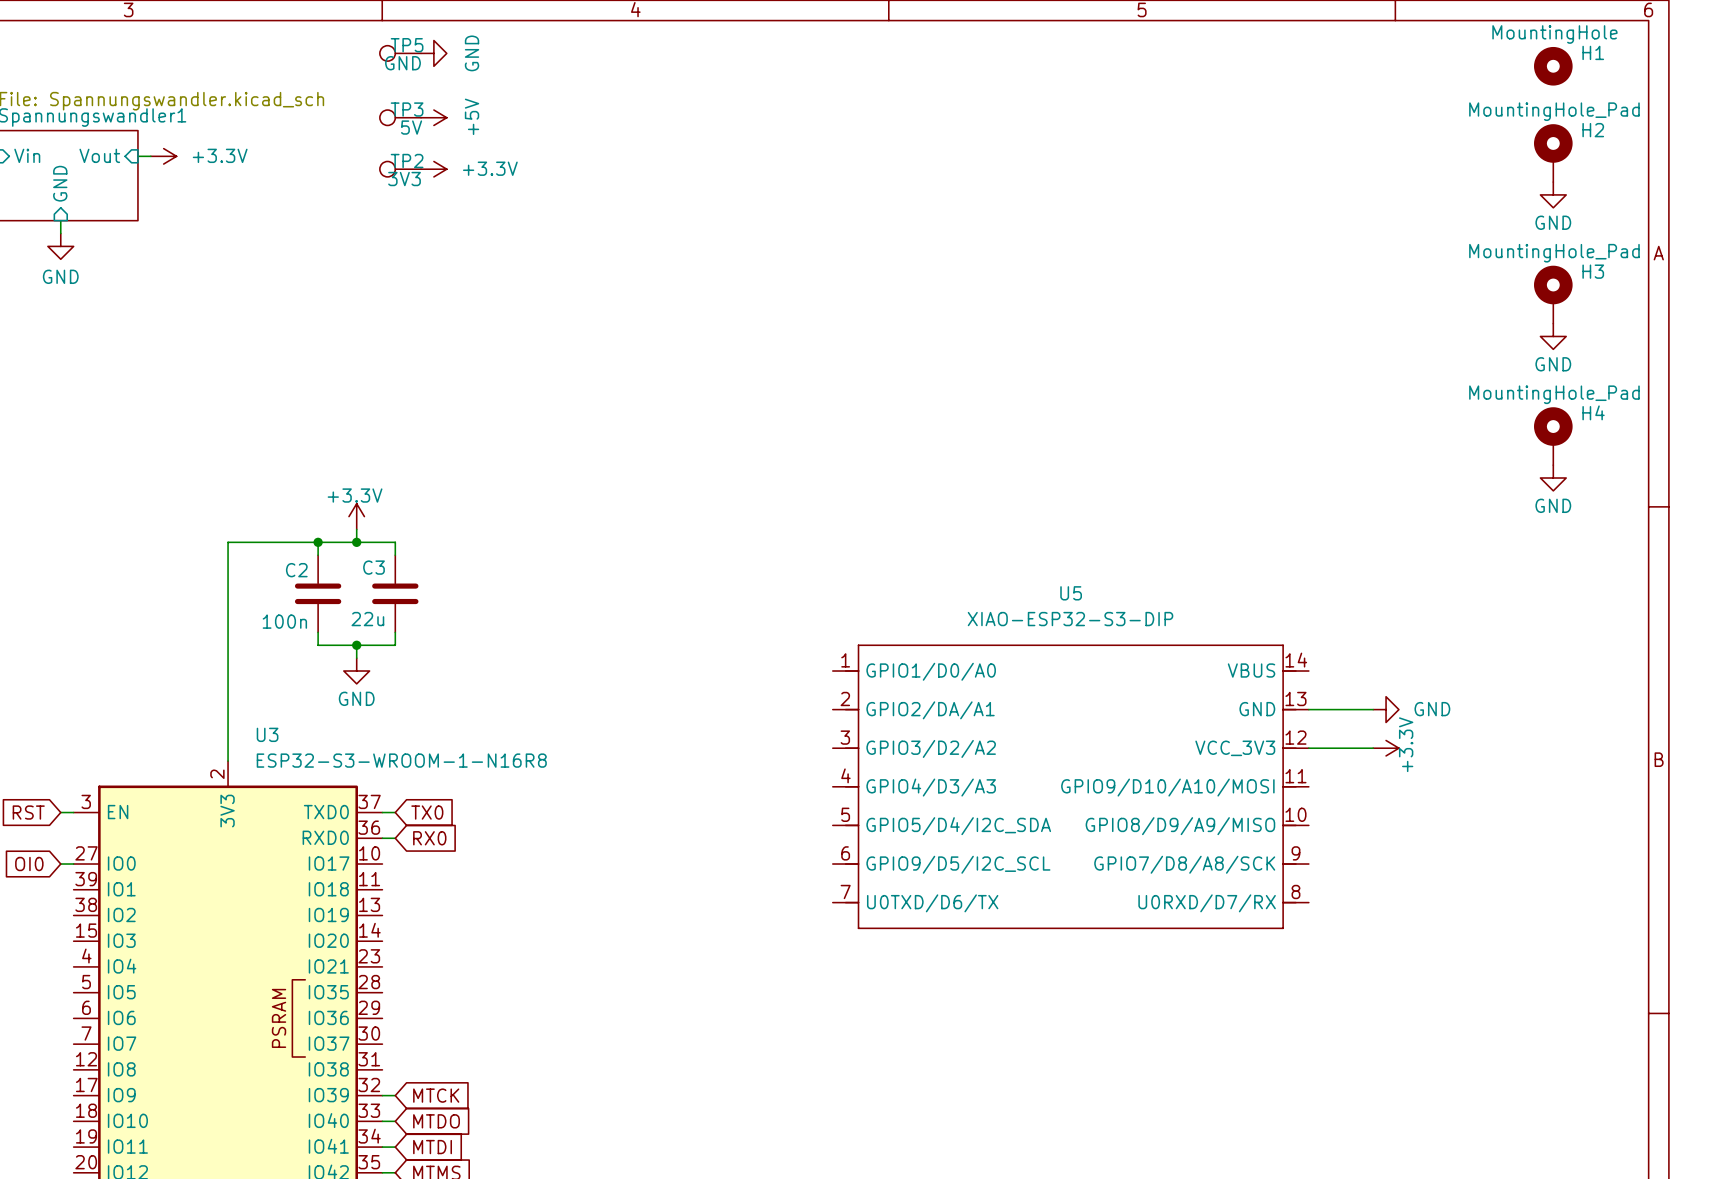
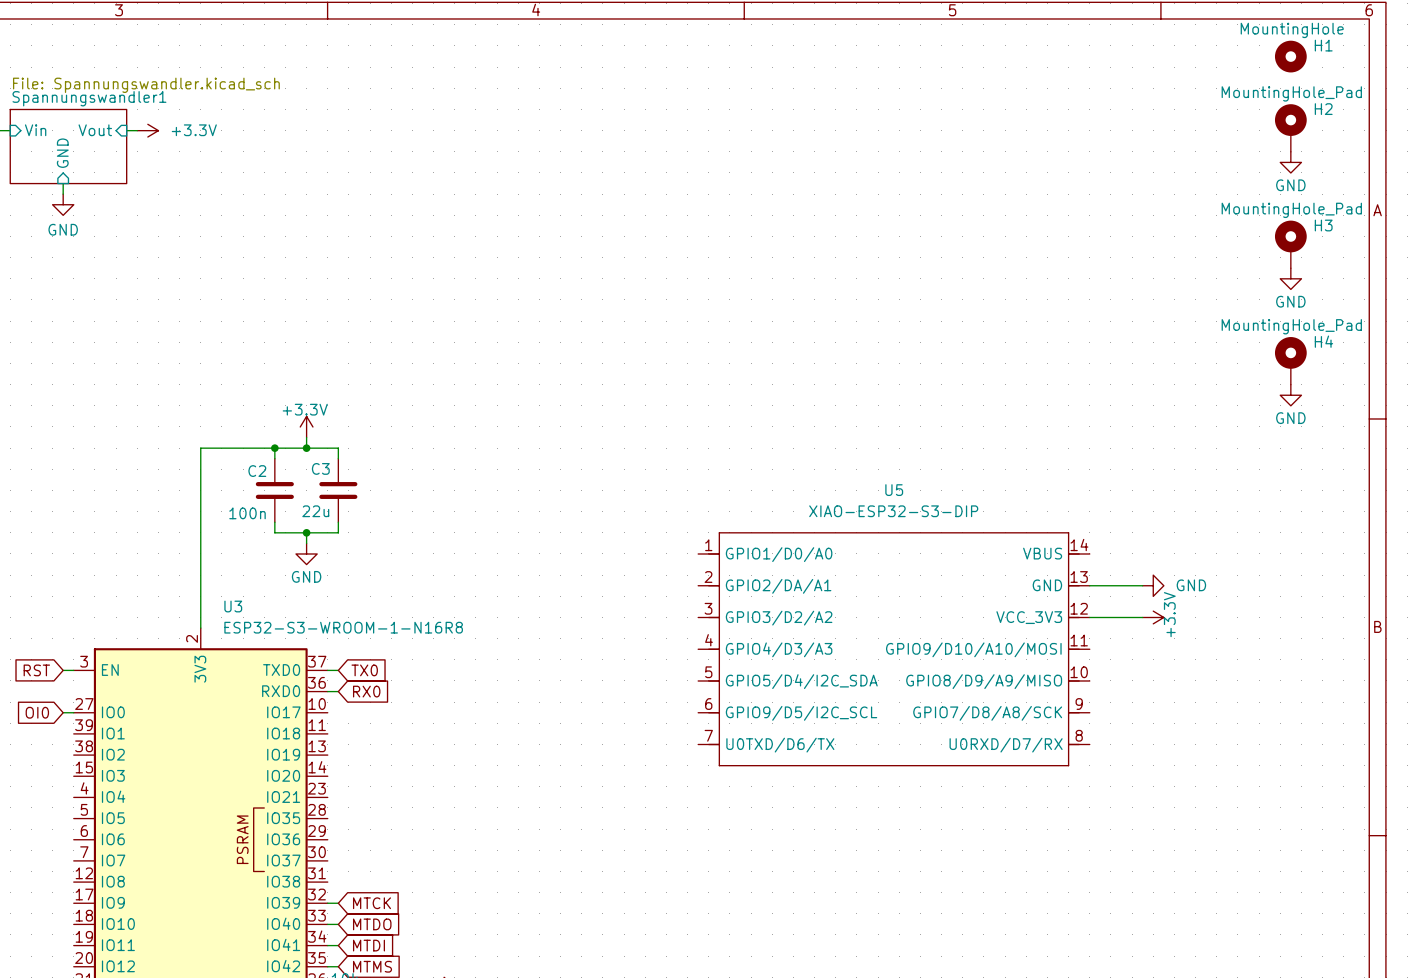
TP5: GND (400, 53) -> none
power symbol: GND (433, 53) -> none
TP3: 5V (400, 117) -> none
power symbol: +5V (433, 117) -> none
TP2: 3V3 (400, 169) -> none
power symbol: +3.3V (433, 169) -> none

